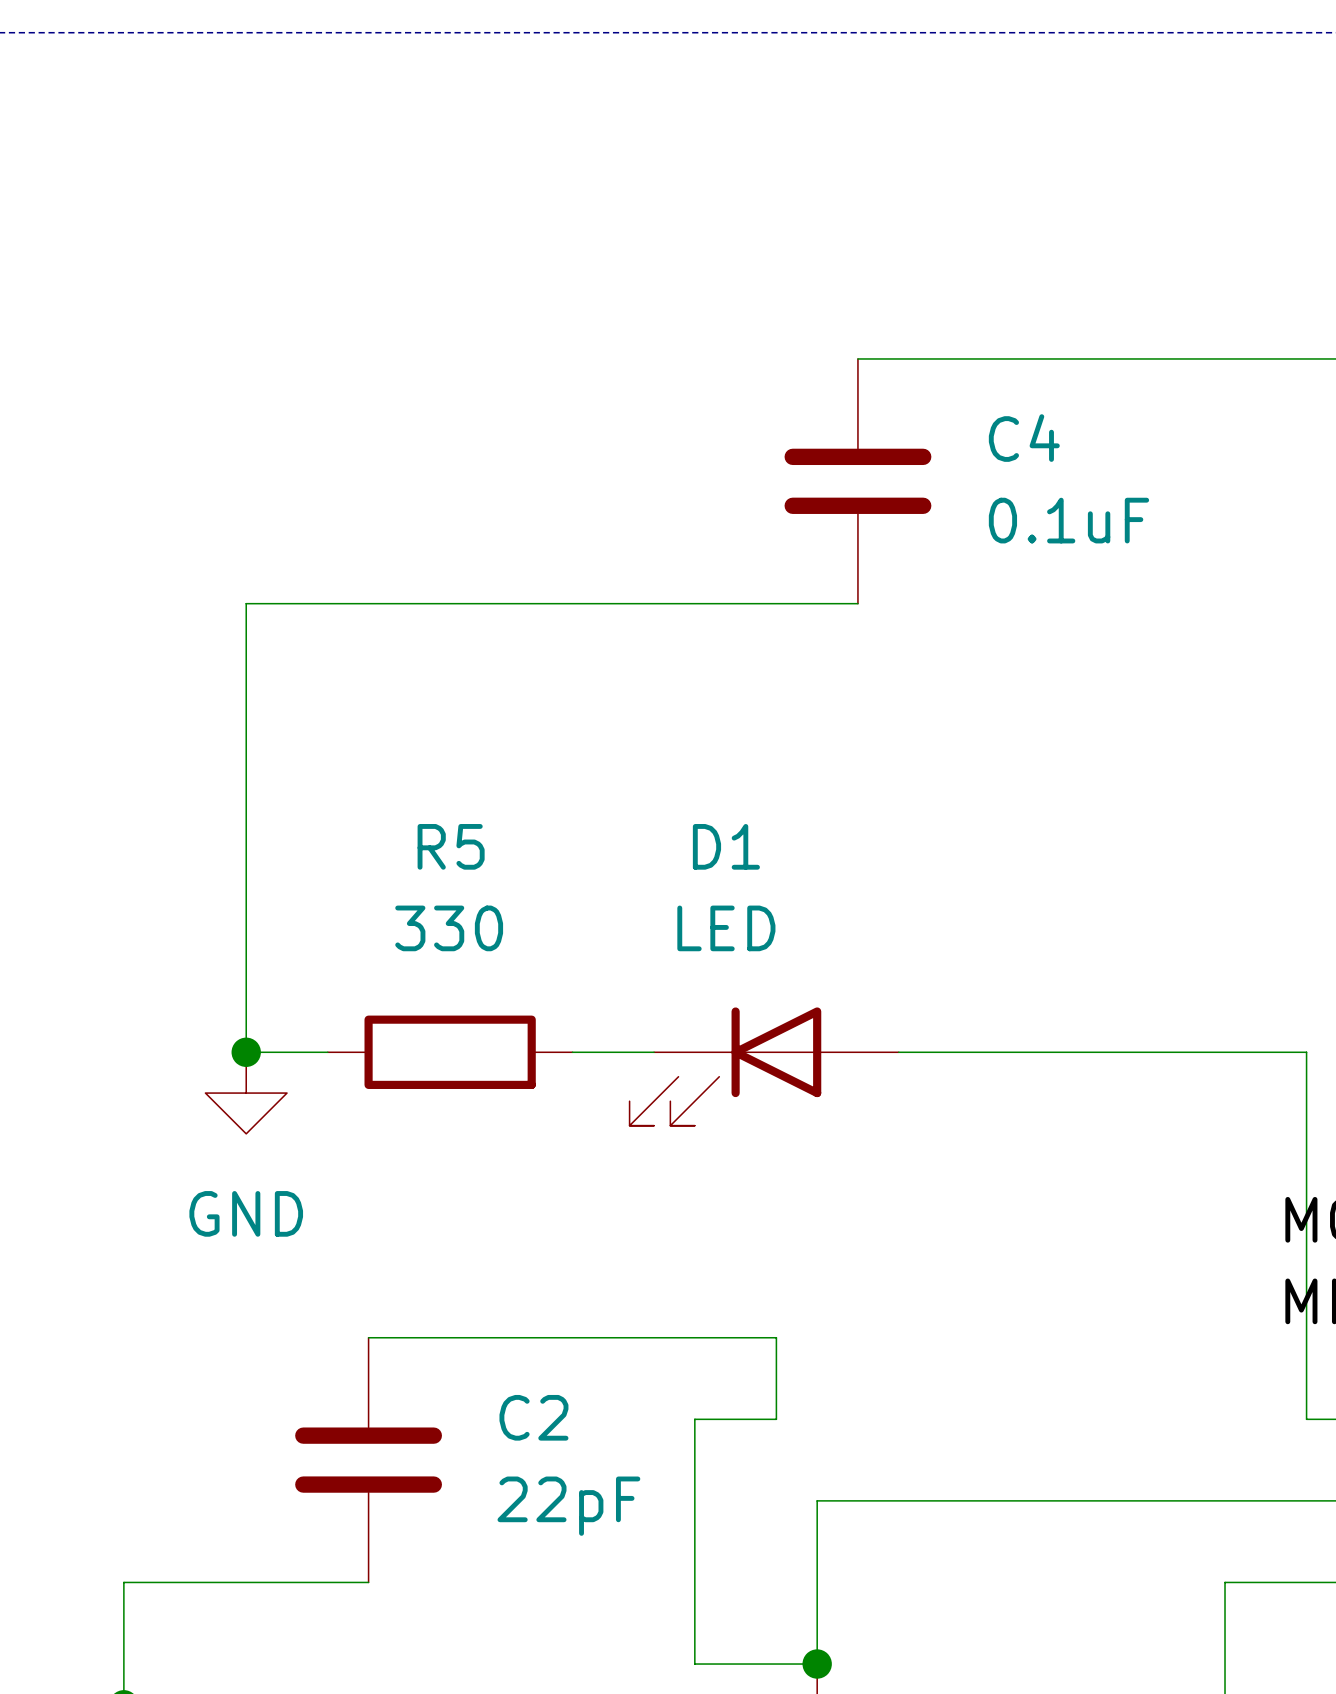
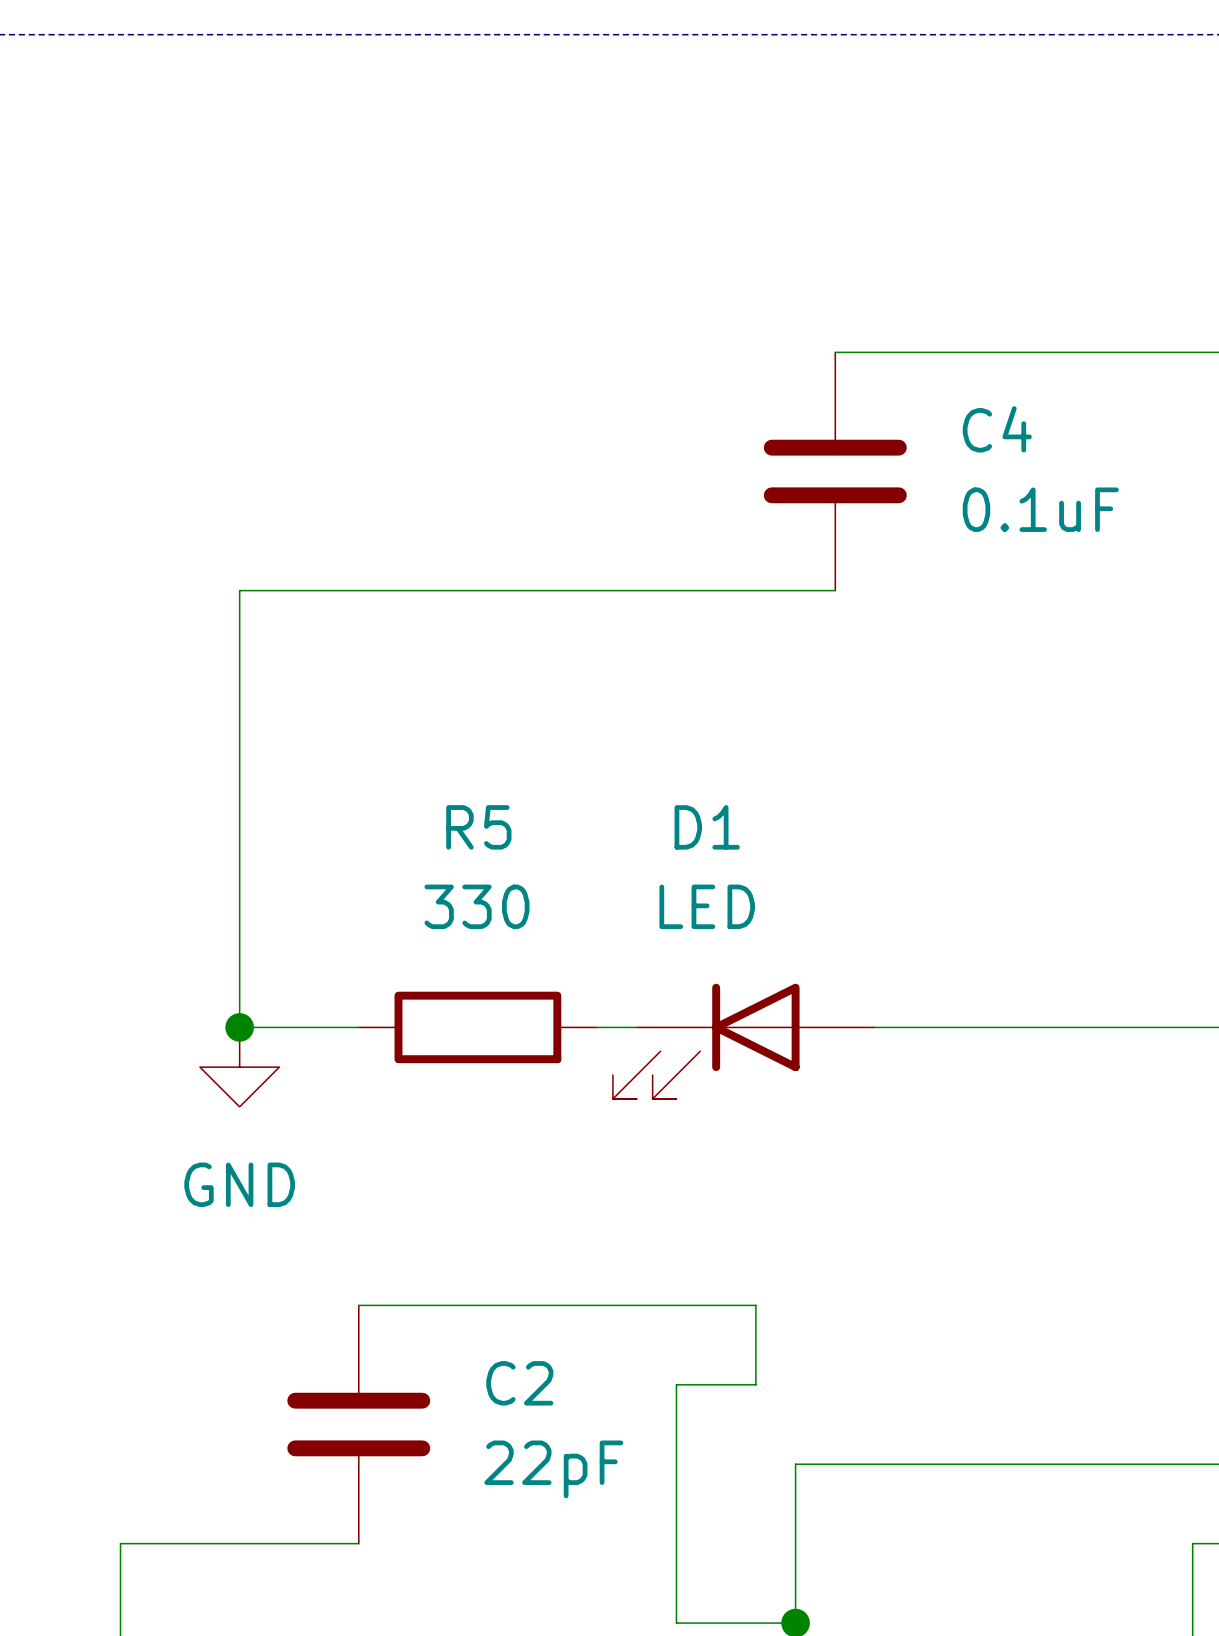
R5 position: (450, 1052) -> (477, 1027)

